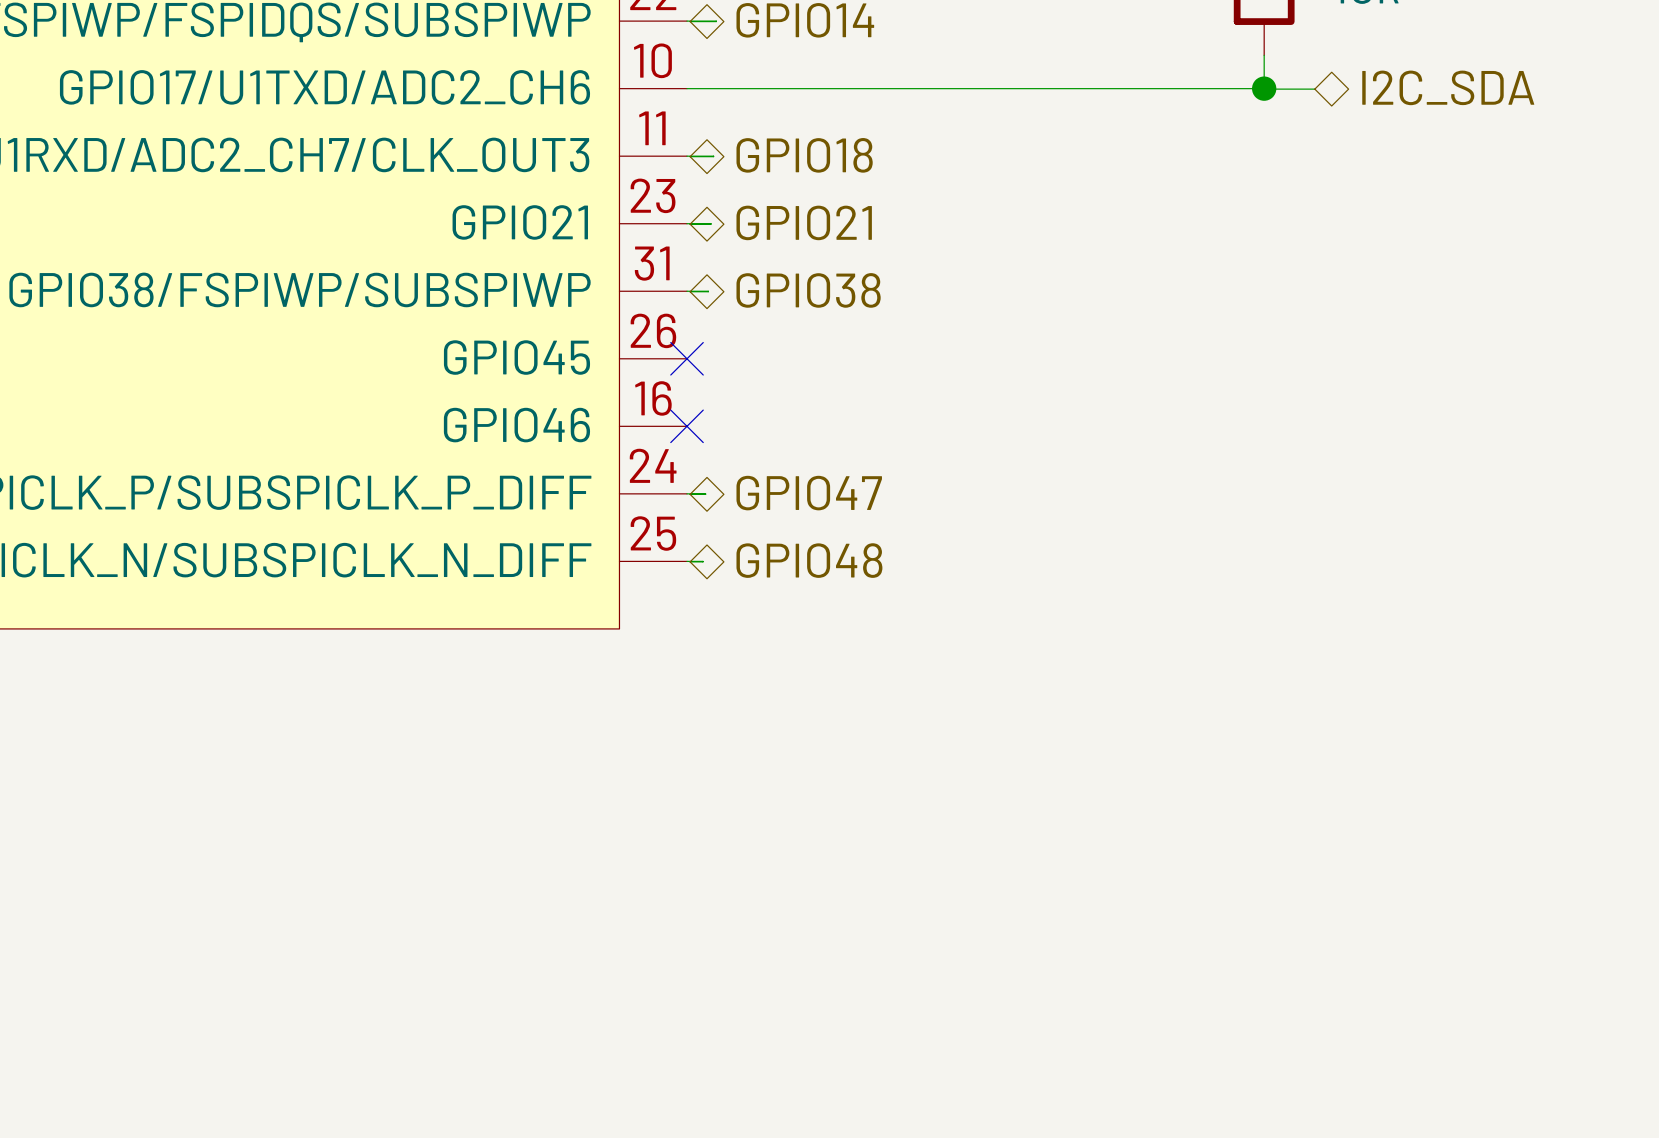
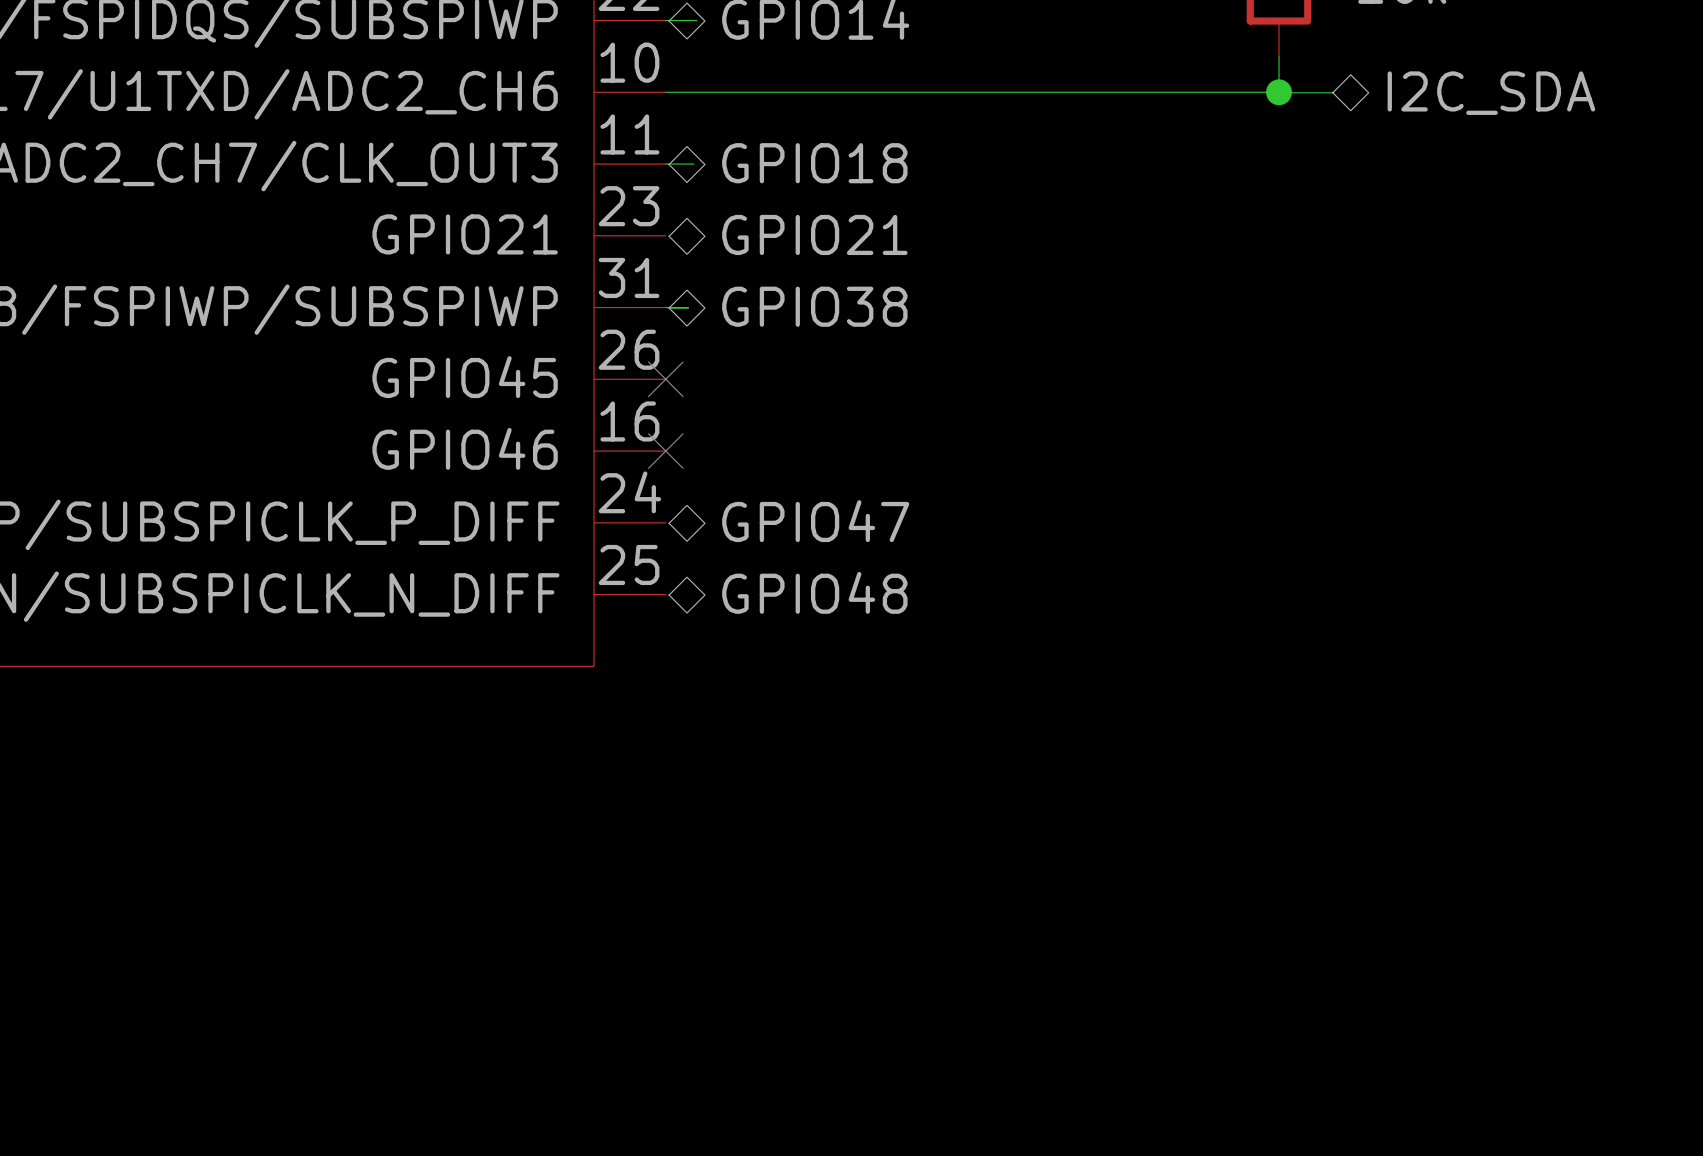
wire: (687, 223) (710, 223) -> none
wire: (690, 224) (710, 224) -> none
wire: (687, 493) (705, 493) -> none
wire: (690, 494) (705, 494) -> none
wire: (687, 561) (702, 561) -> none

